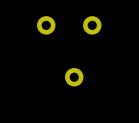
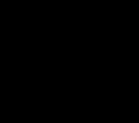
part: (46, 25) -> none
part: (92, 25) -> none
part: (74, 77) -> none

